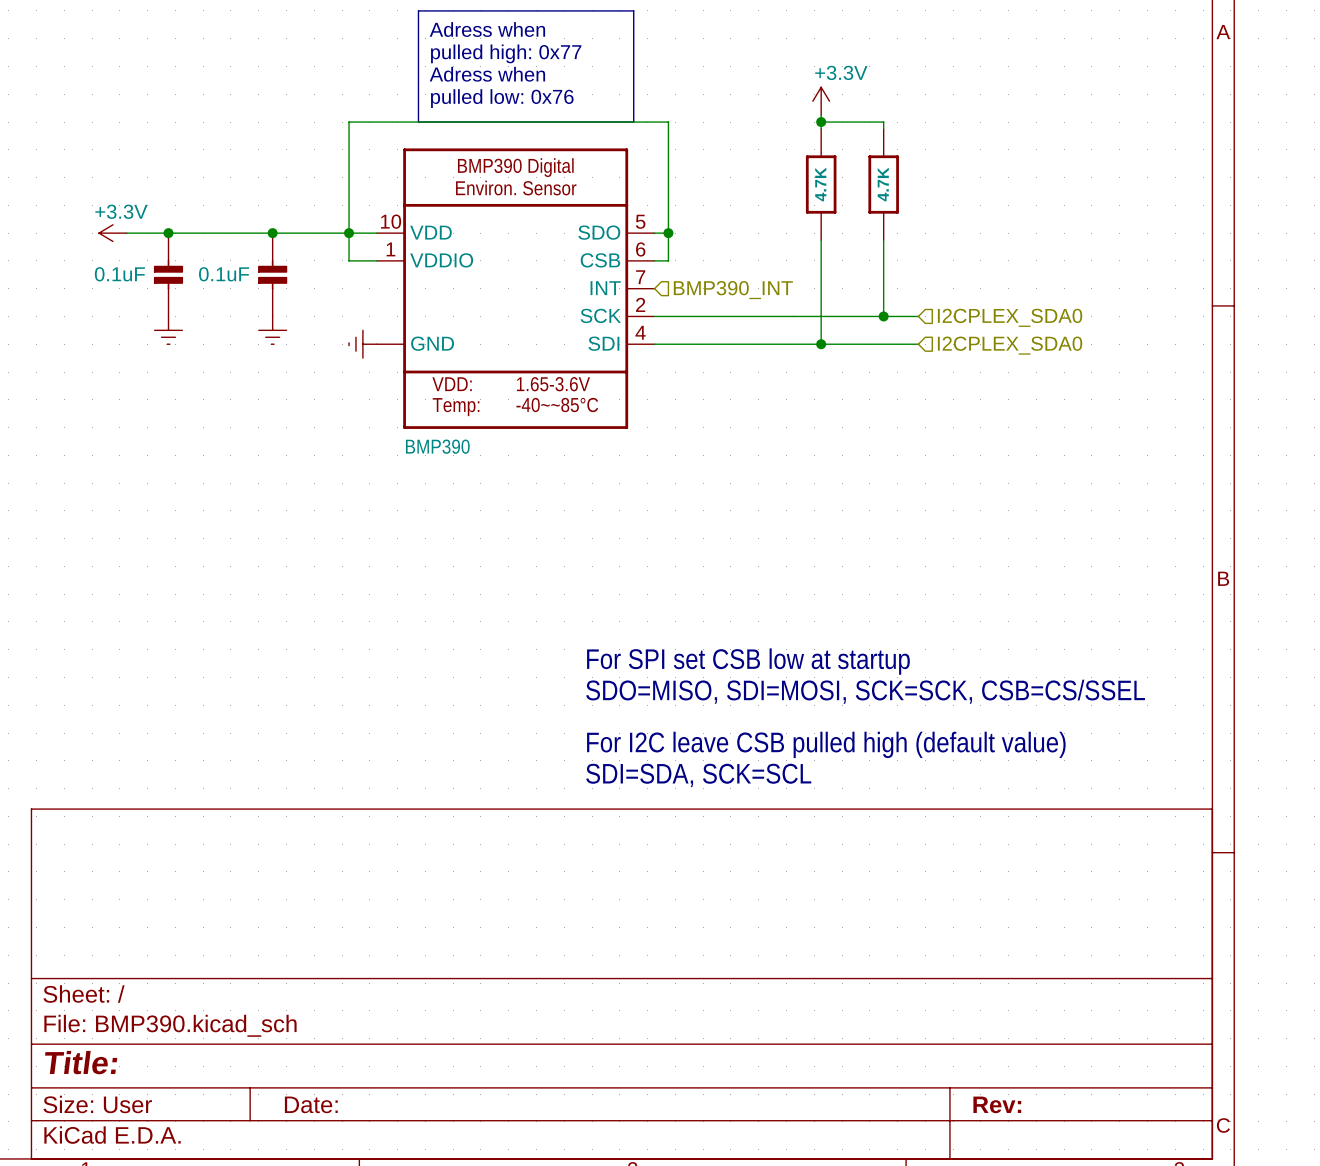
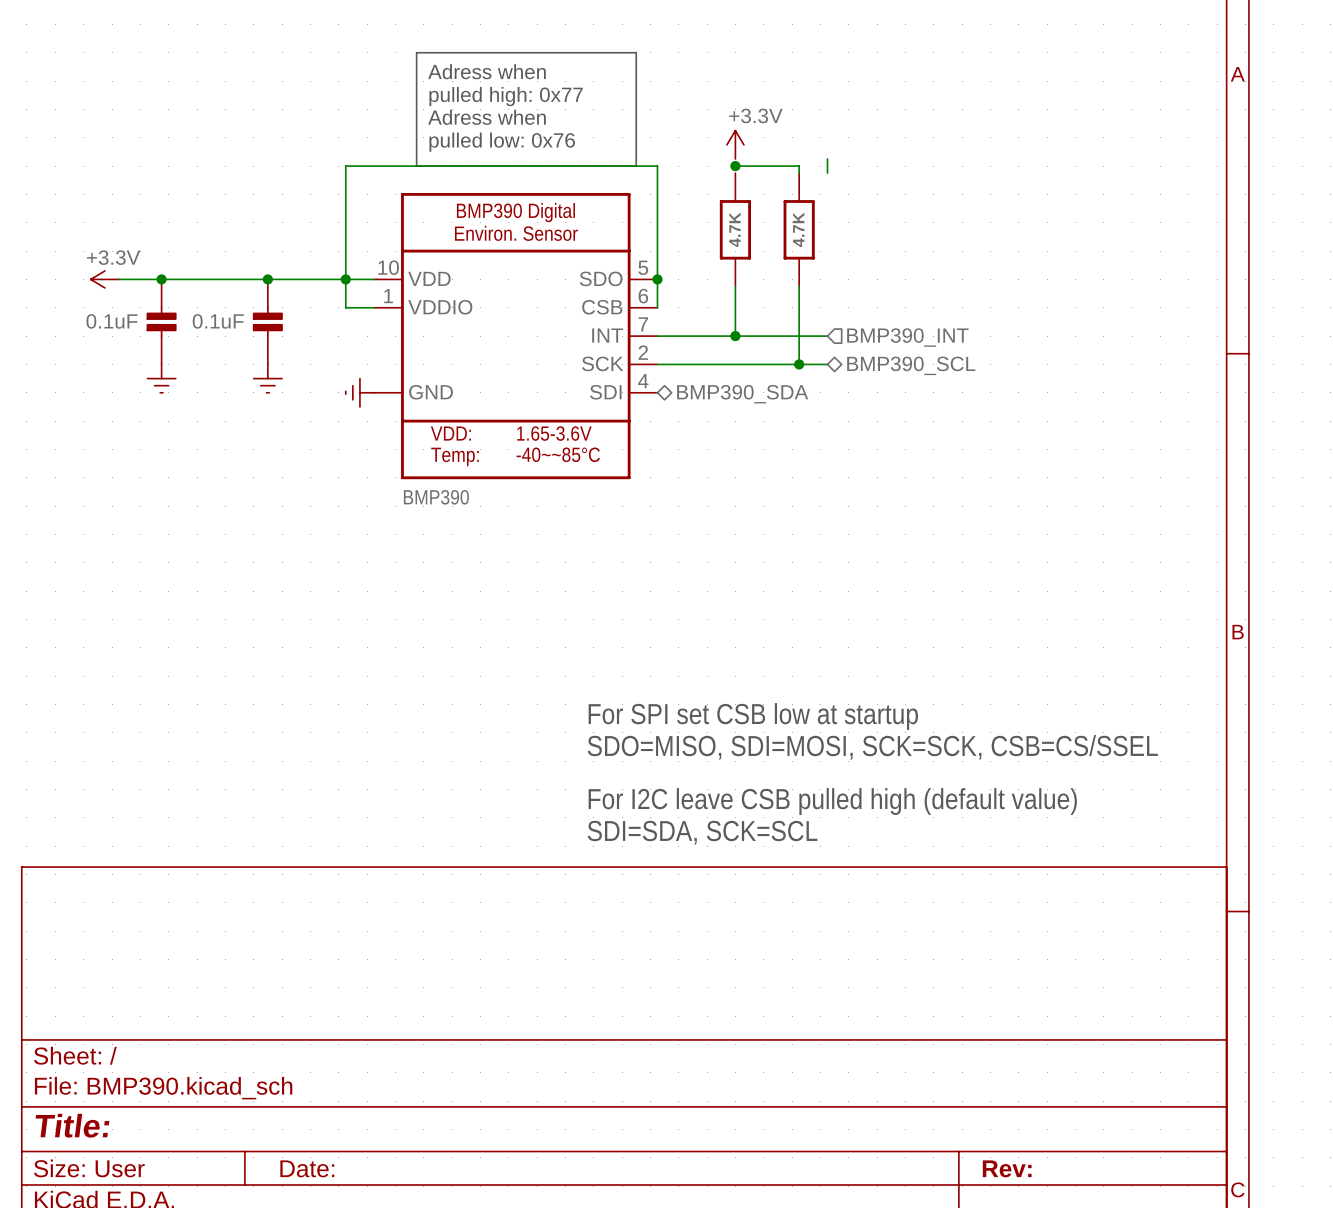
power symbol position: +3.3V (821, 101) -> +3.3V (735, 144)
wire: (654, 122) (668, 122) (668, 260) (654, 260) -> (657, 166) (657, 307)
junction: none -> (735, 166)
wire: (821, 122) (883, 122) (883, 128) -> (735, 166) (799, 166) (799, 173)
junction: (821, 122) -> none
part: none -> 4.7K (735, 229)
part position: (821, 184) -> (799, 229)
part: 4.7K (883, 184) -> none
wire: (654, 233) (668, 233) -> none
junction position: (668, 233) -> (657, 279)
wire: none -> (735, 286) (735, 336)
wire: (821, 240) (821, 344) -> none
wire: (883, 240) (883, 316) -> (799, 286) (799, 364)
wire: none -> (657, 336) (827, 336)
junction: none -> (735, 336)
hierarchical label position: BMP390_INT (733, 290) -> BMP390_INT (907, 337)
wire: (821, 316) (918, 316) -> none
junction: (883, 316) -> none
hierarchical label: none -> BMP390_SCL (911, 365)
hierarchical label: I2CPLEX_SDA0 (1010, 317) -> none
wire: (654, 344) (918, 344) -> none
junction position: (821, 344) -> (799, 364)
hierarchical label: none -> BMP390_SDA (742, 394)
hierarchical label: I2CPLEX_SDA0 (1010, 345) -> none

